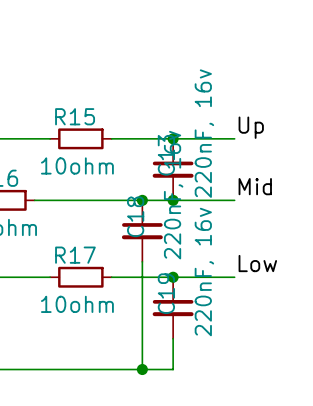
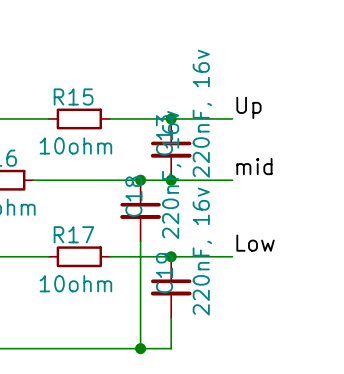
label: Mid (255, 186) -> mid (254, 166)

